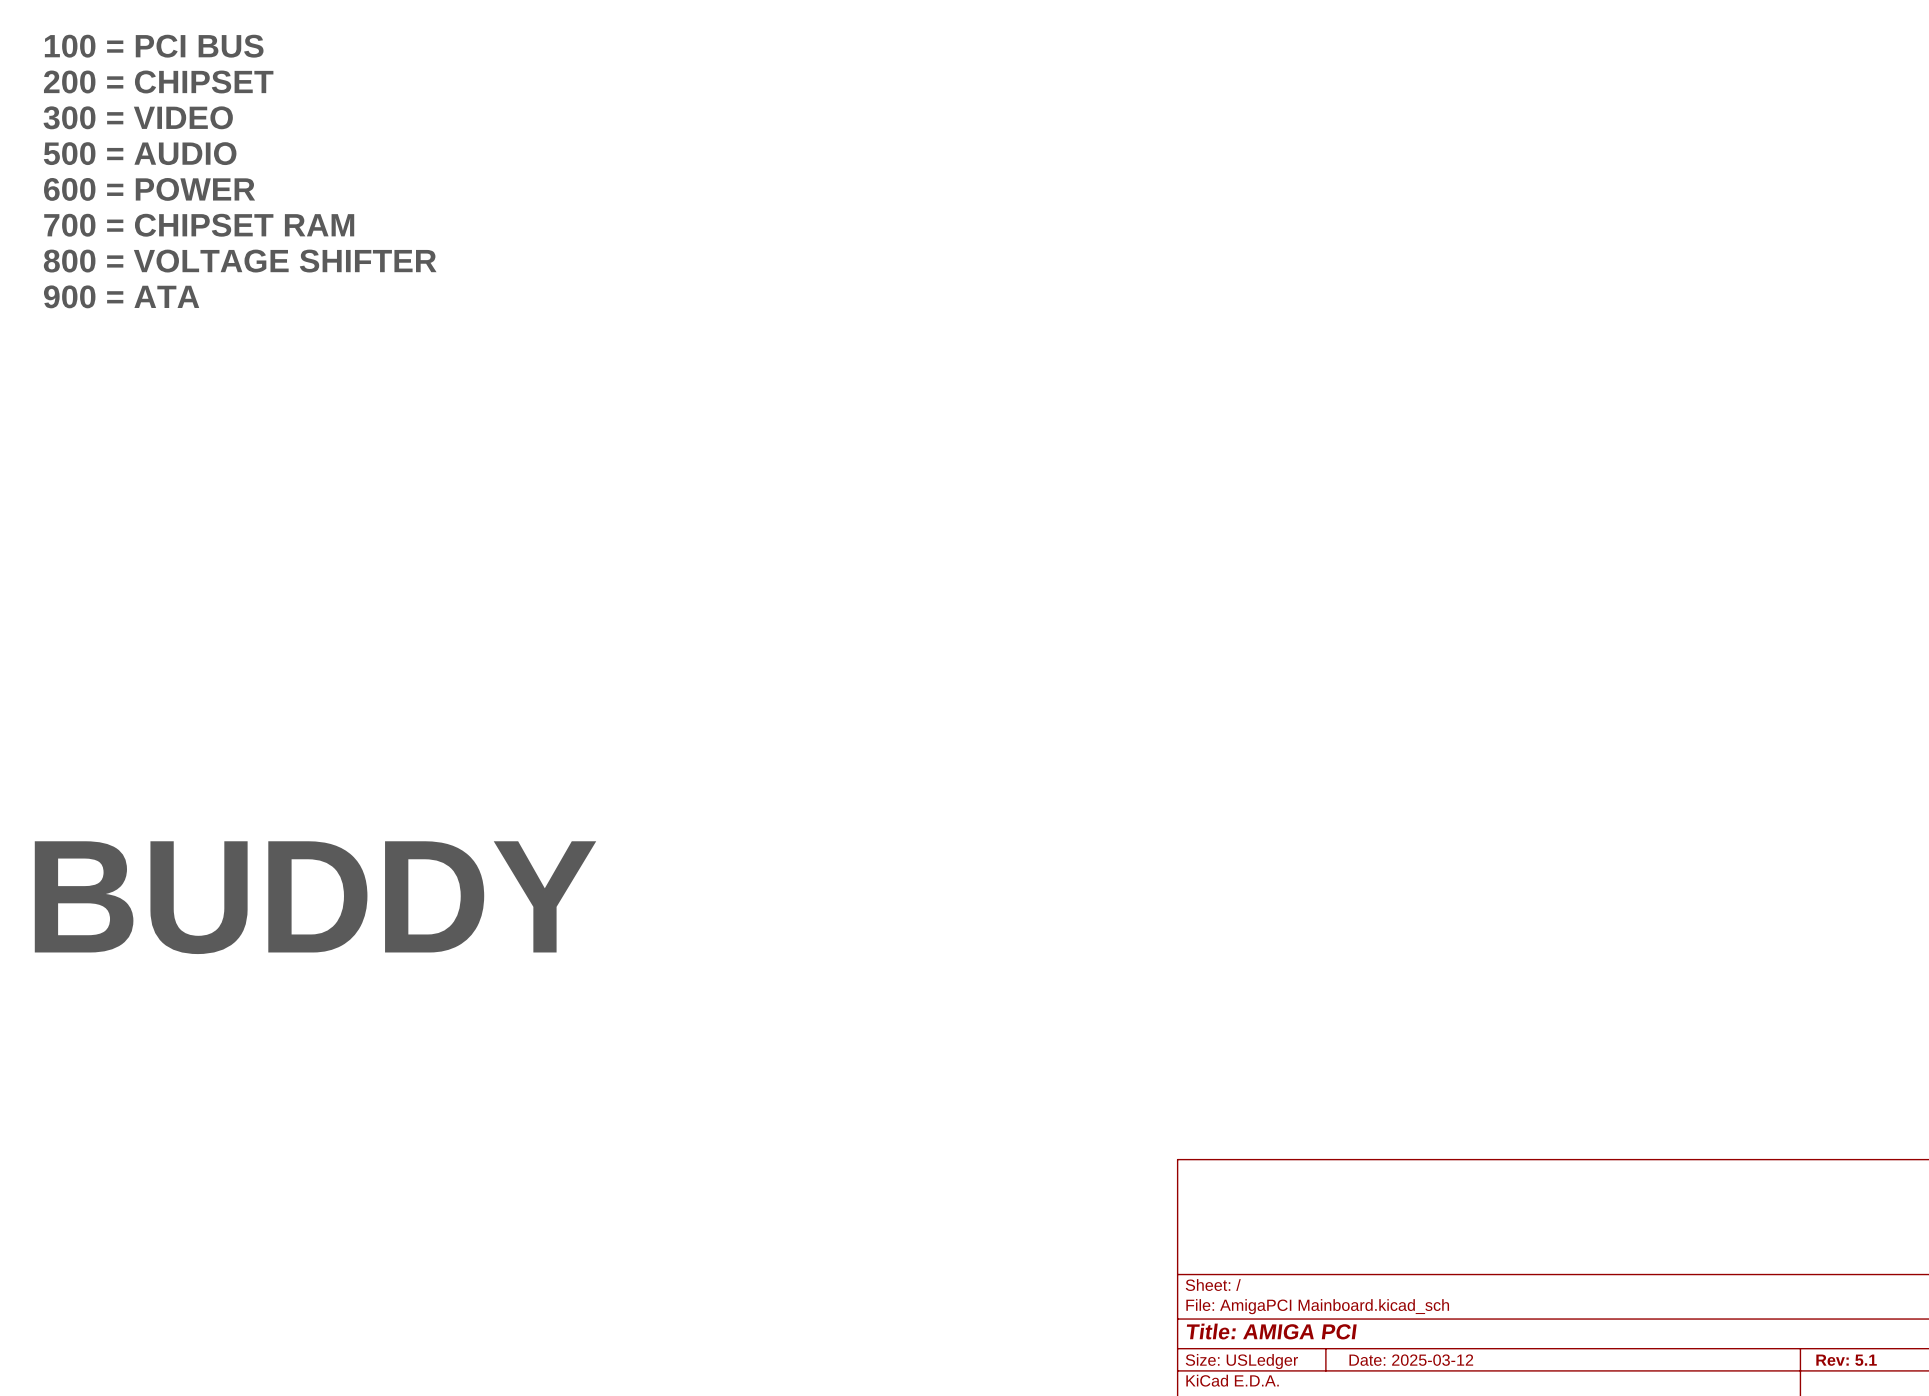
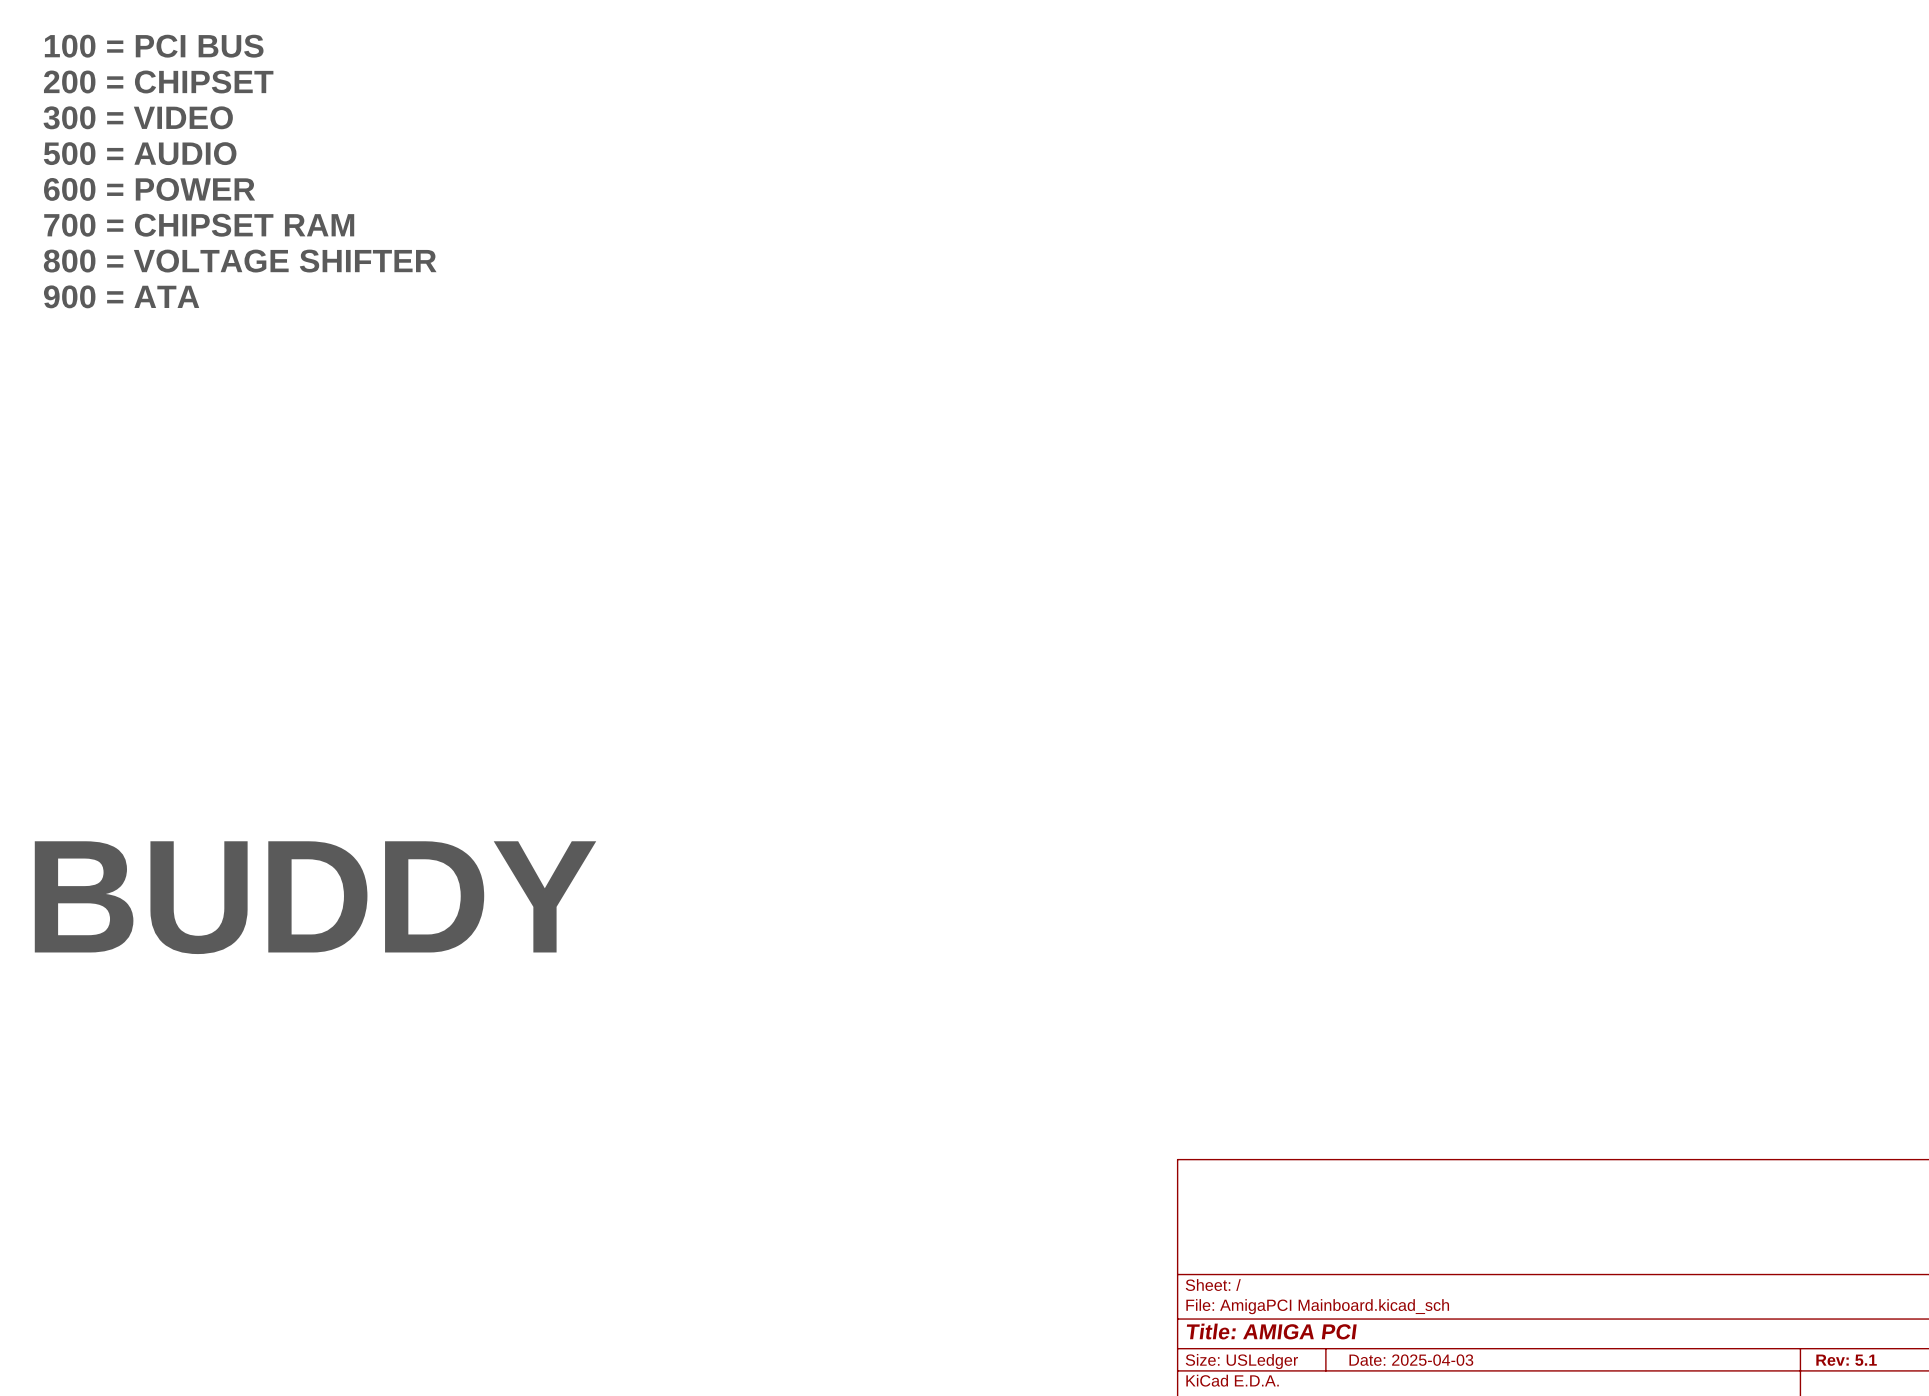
title block: Date: 2025-03-12 (1411, 1360) -> Date: 2025-04-03 (1411, 1360)

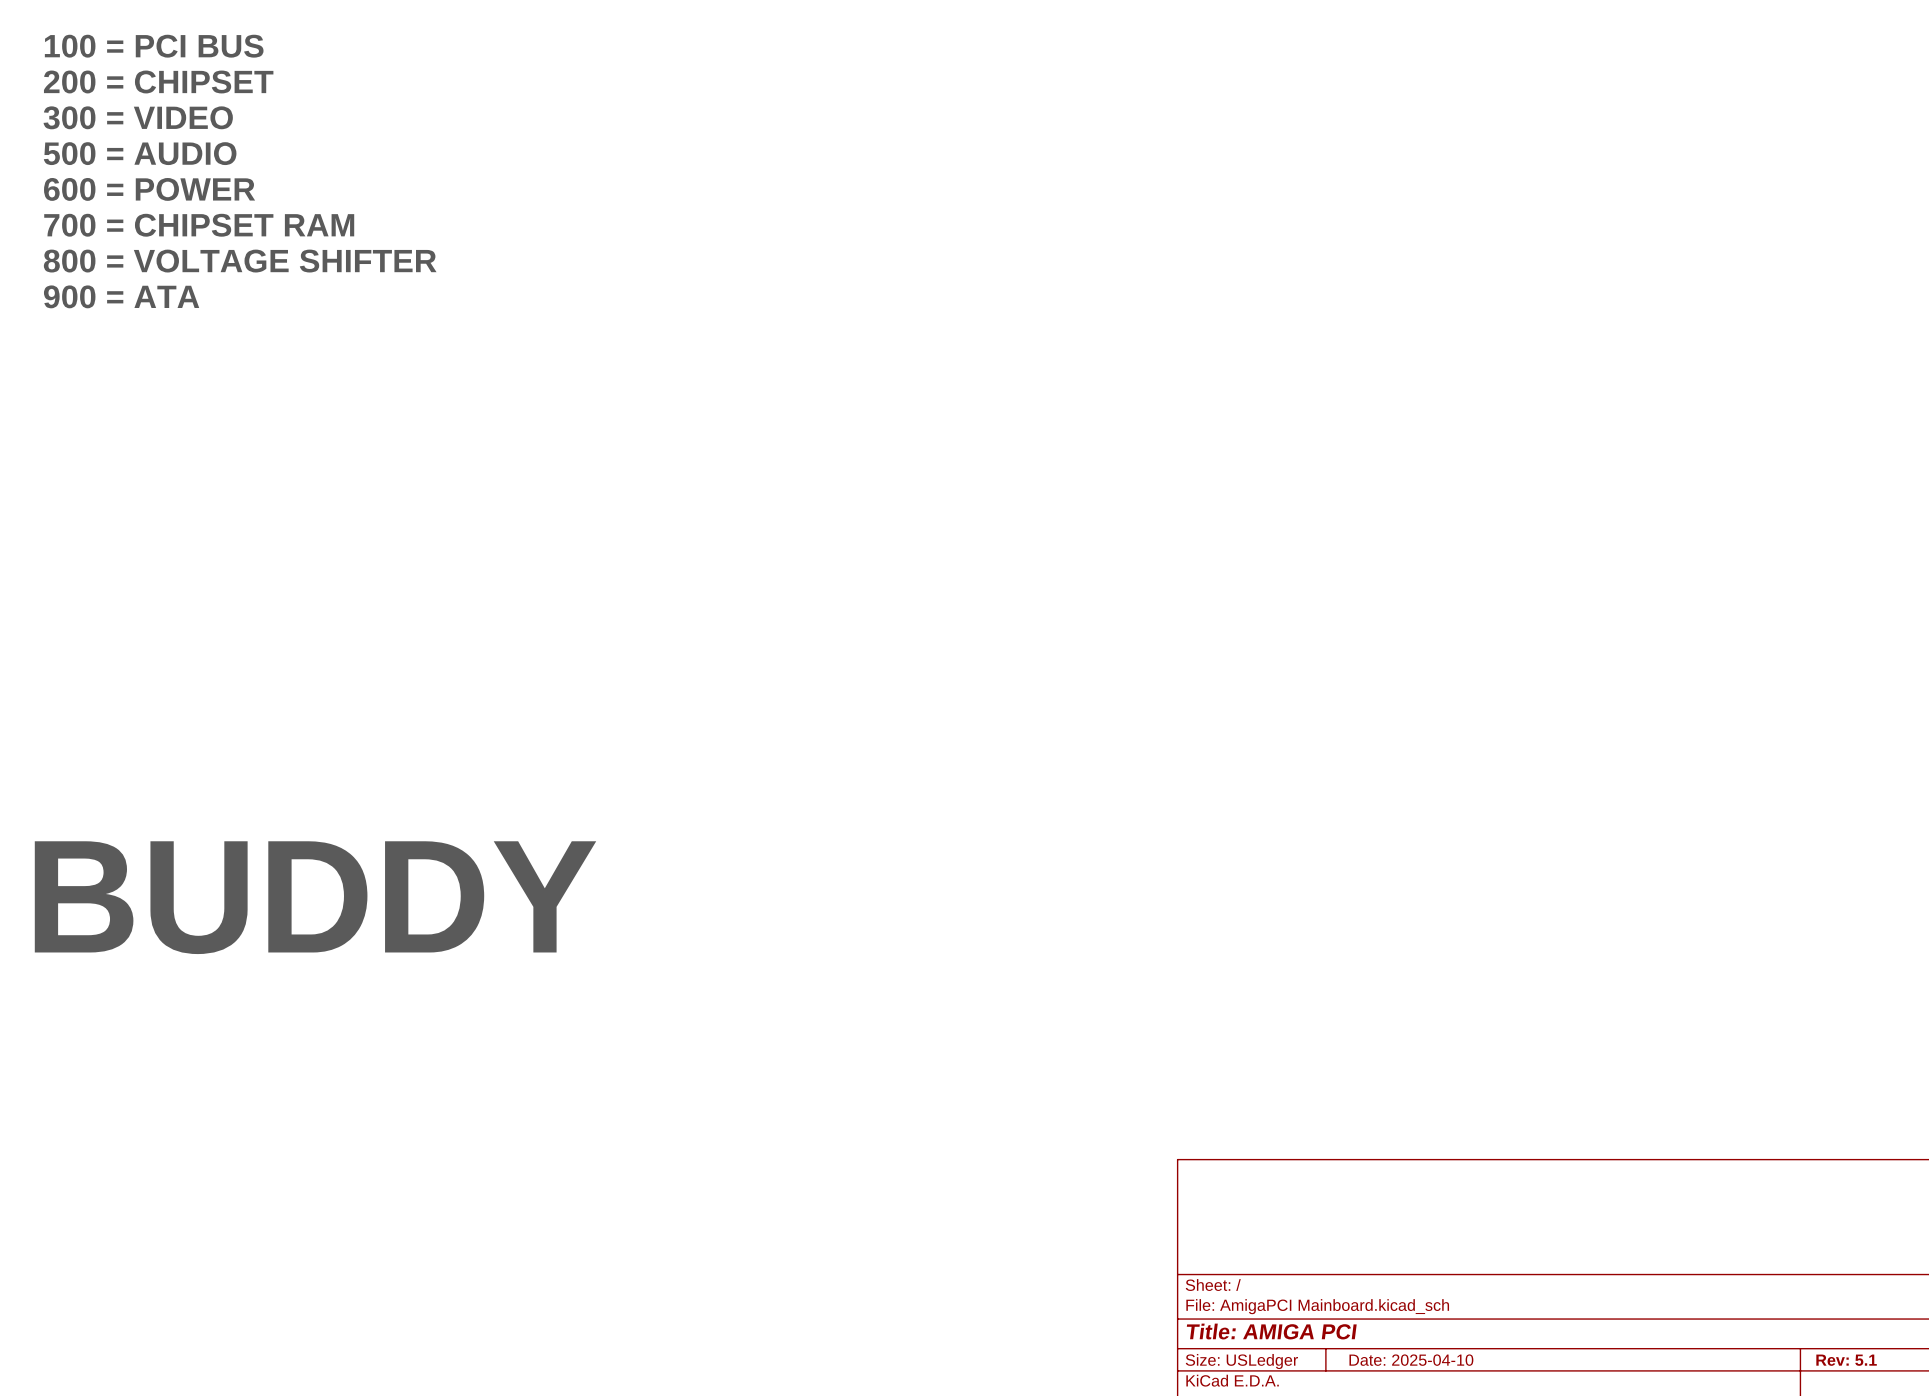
title block: Date: 2025-04-03 (1411, 1360) -> Date: 2025-04-10 (1411, 1360)

